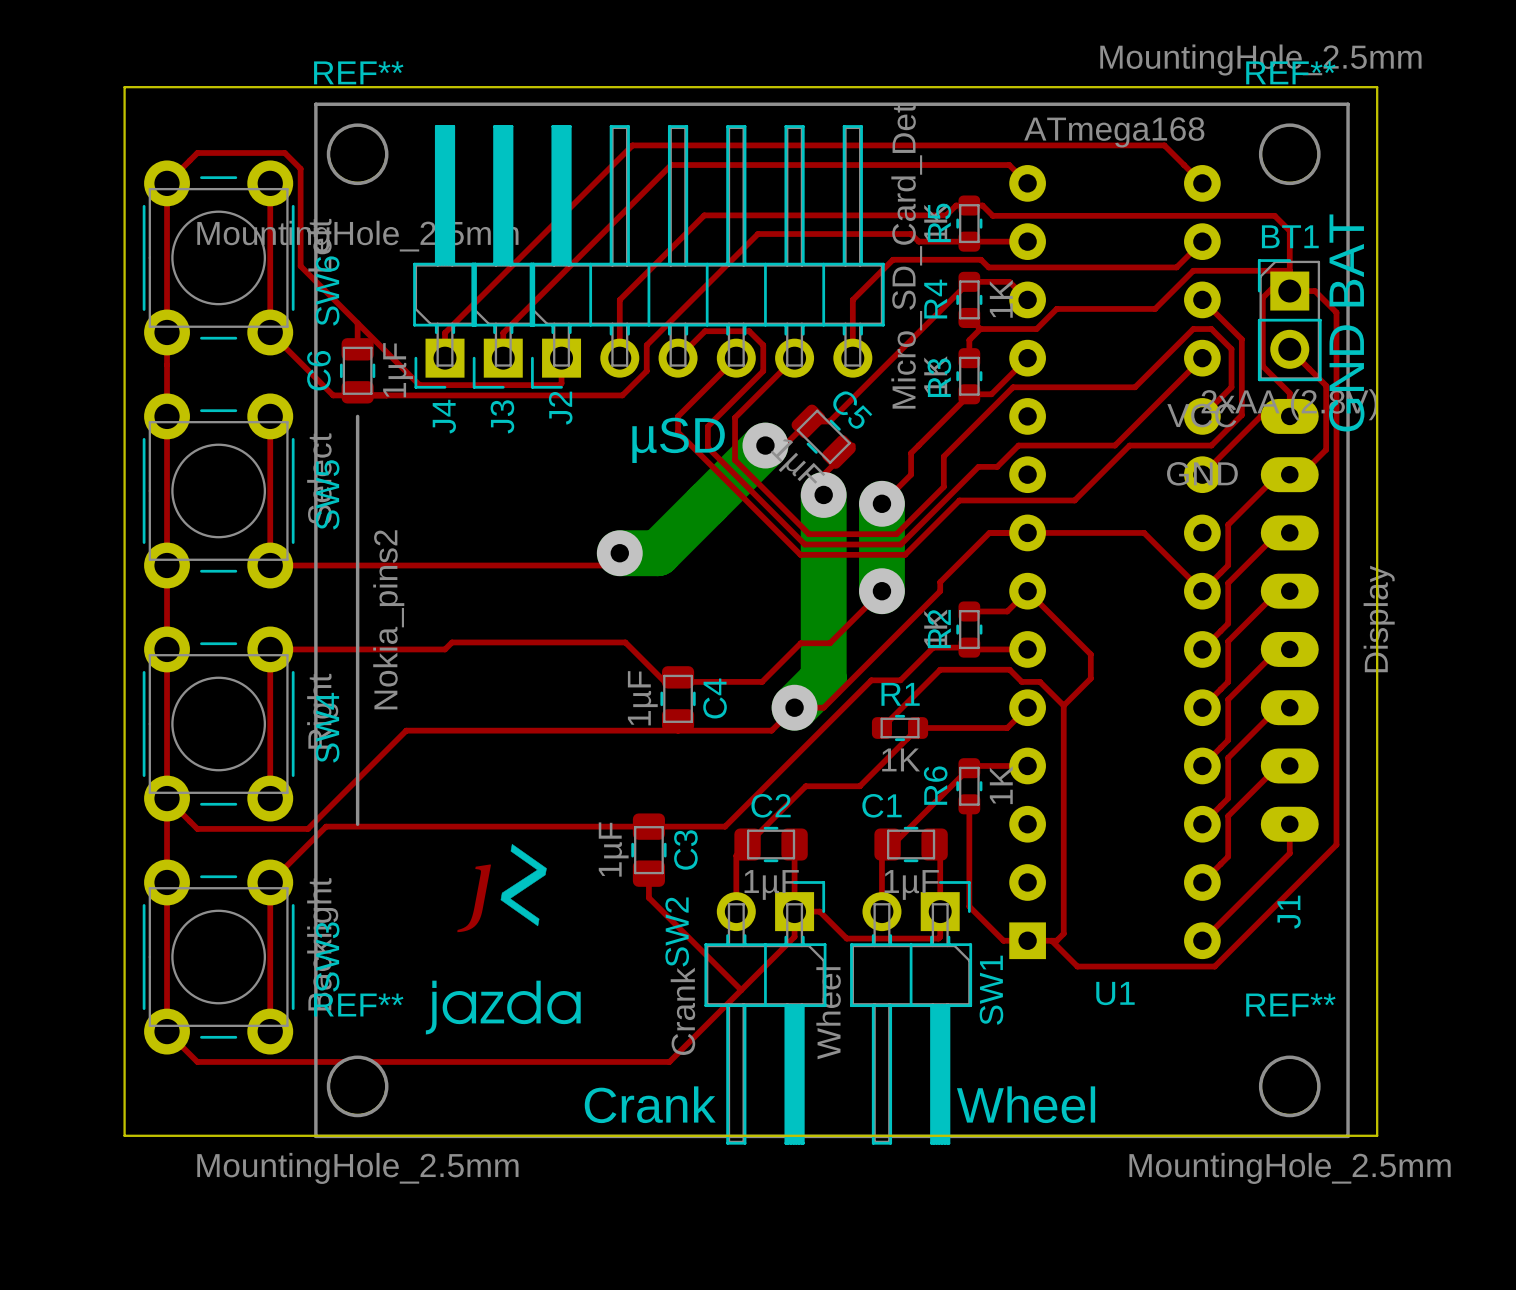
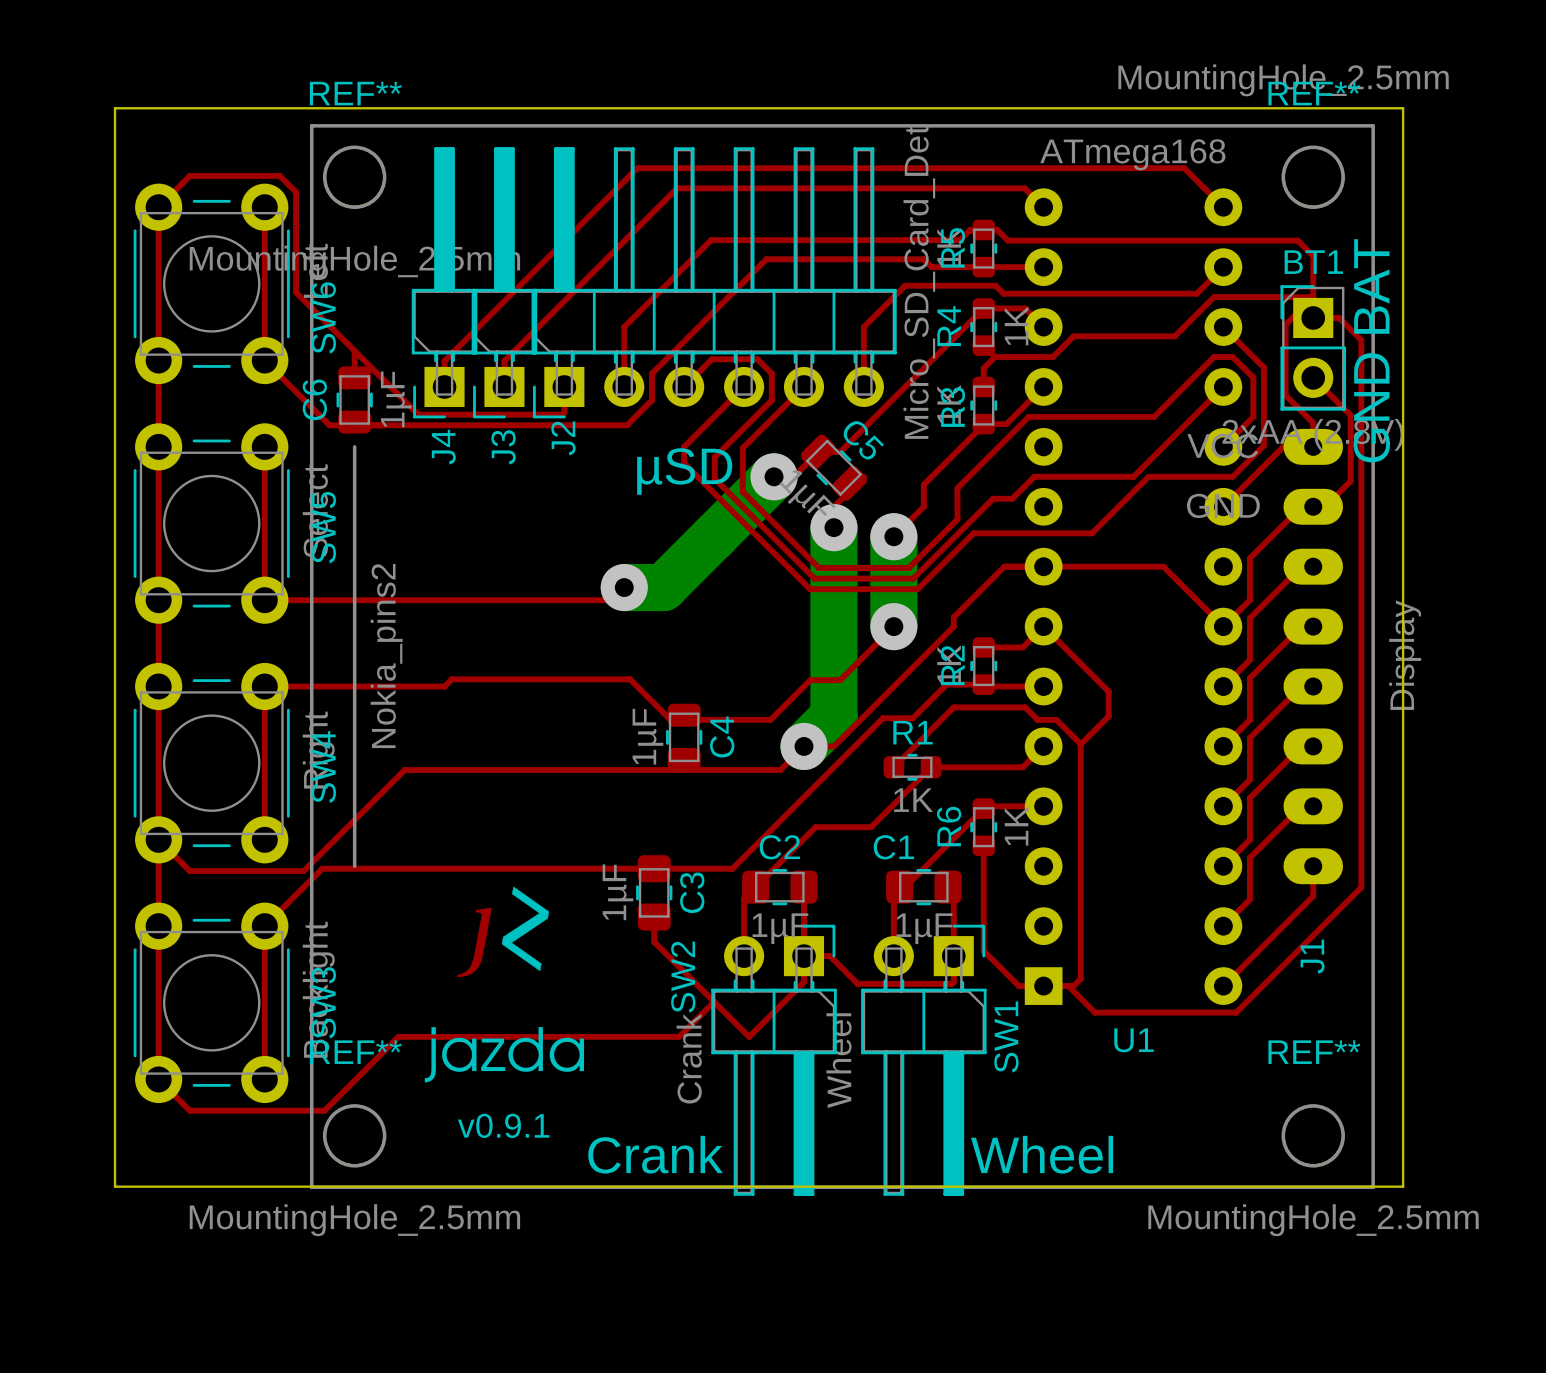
top track: (741, 990) (669, 1061) (328, 1061) -> (714, 1001) (679, 1036) (398, 1036) (324, 1110)
text: none -> v0.9.1 (503, 1125)

